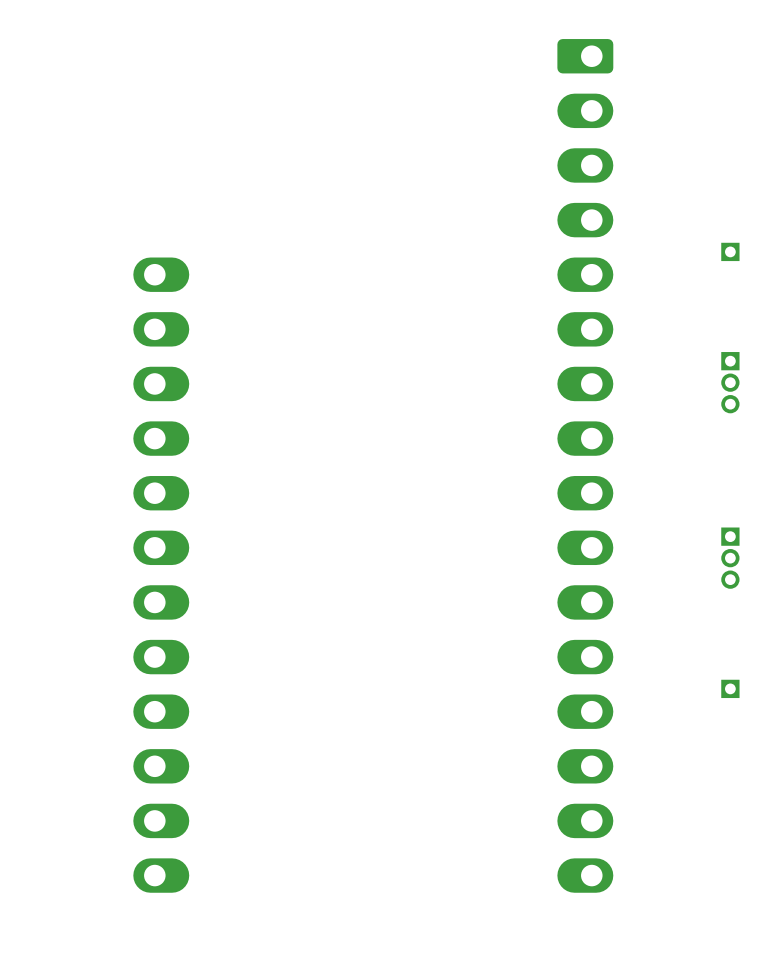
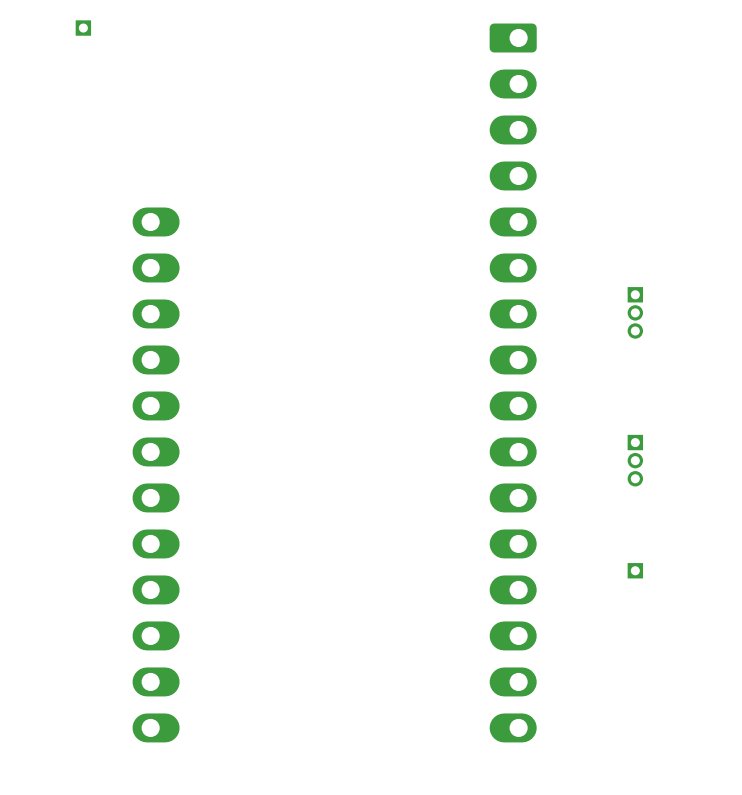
part: none -> (83, 28)
part: (730, 251) -> none

